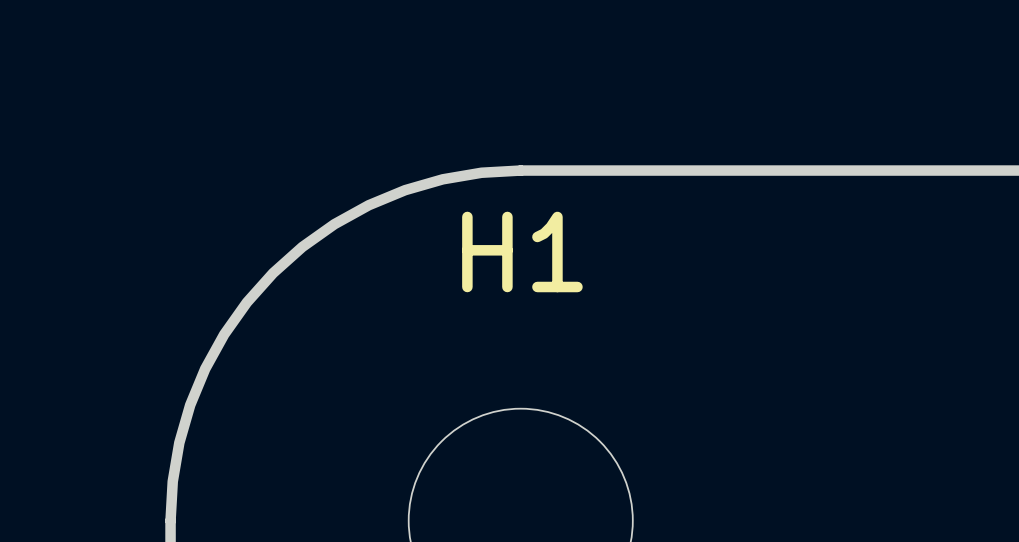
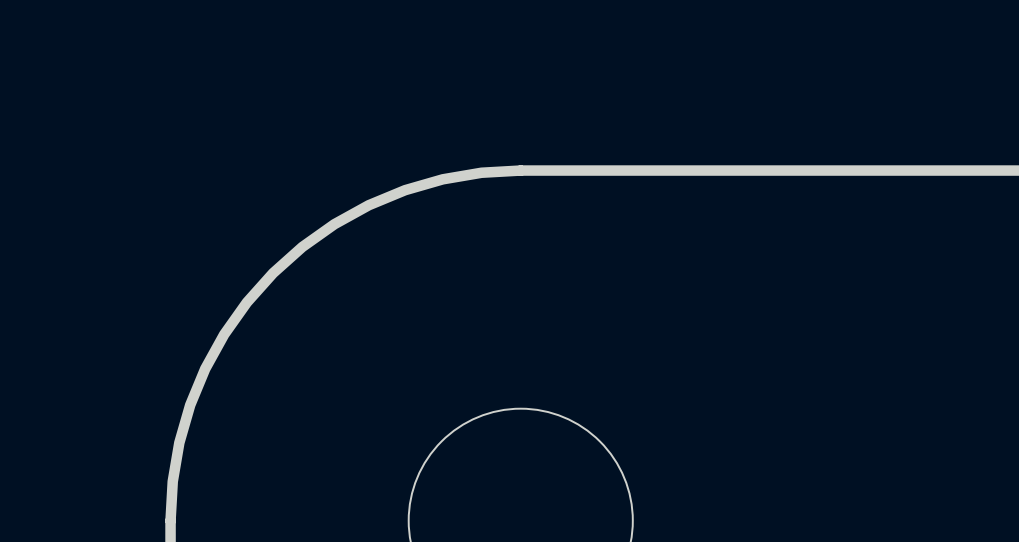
H1 name: H1 (522, 251) -> none

